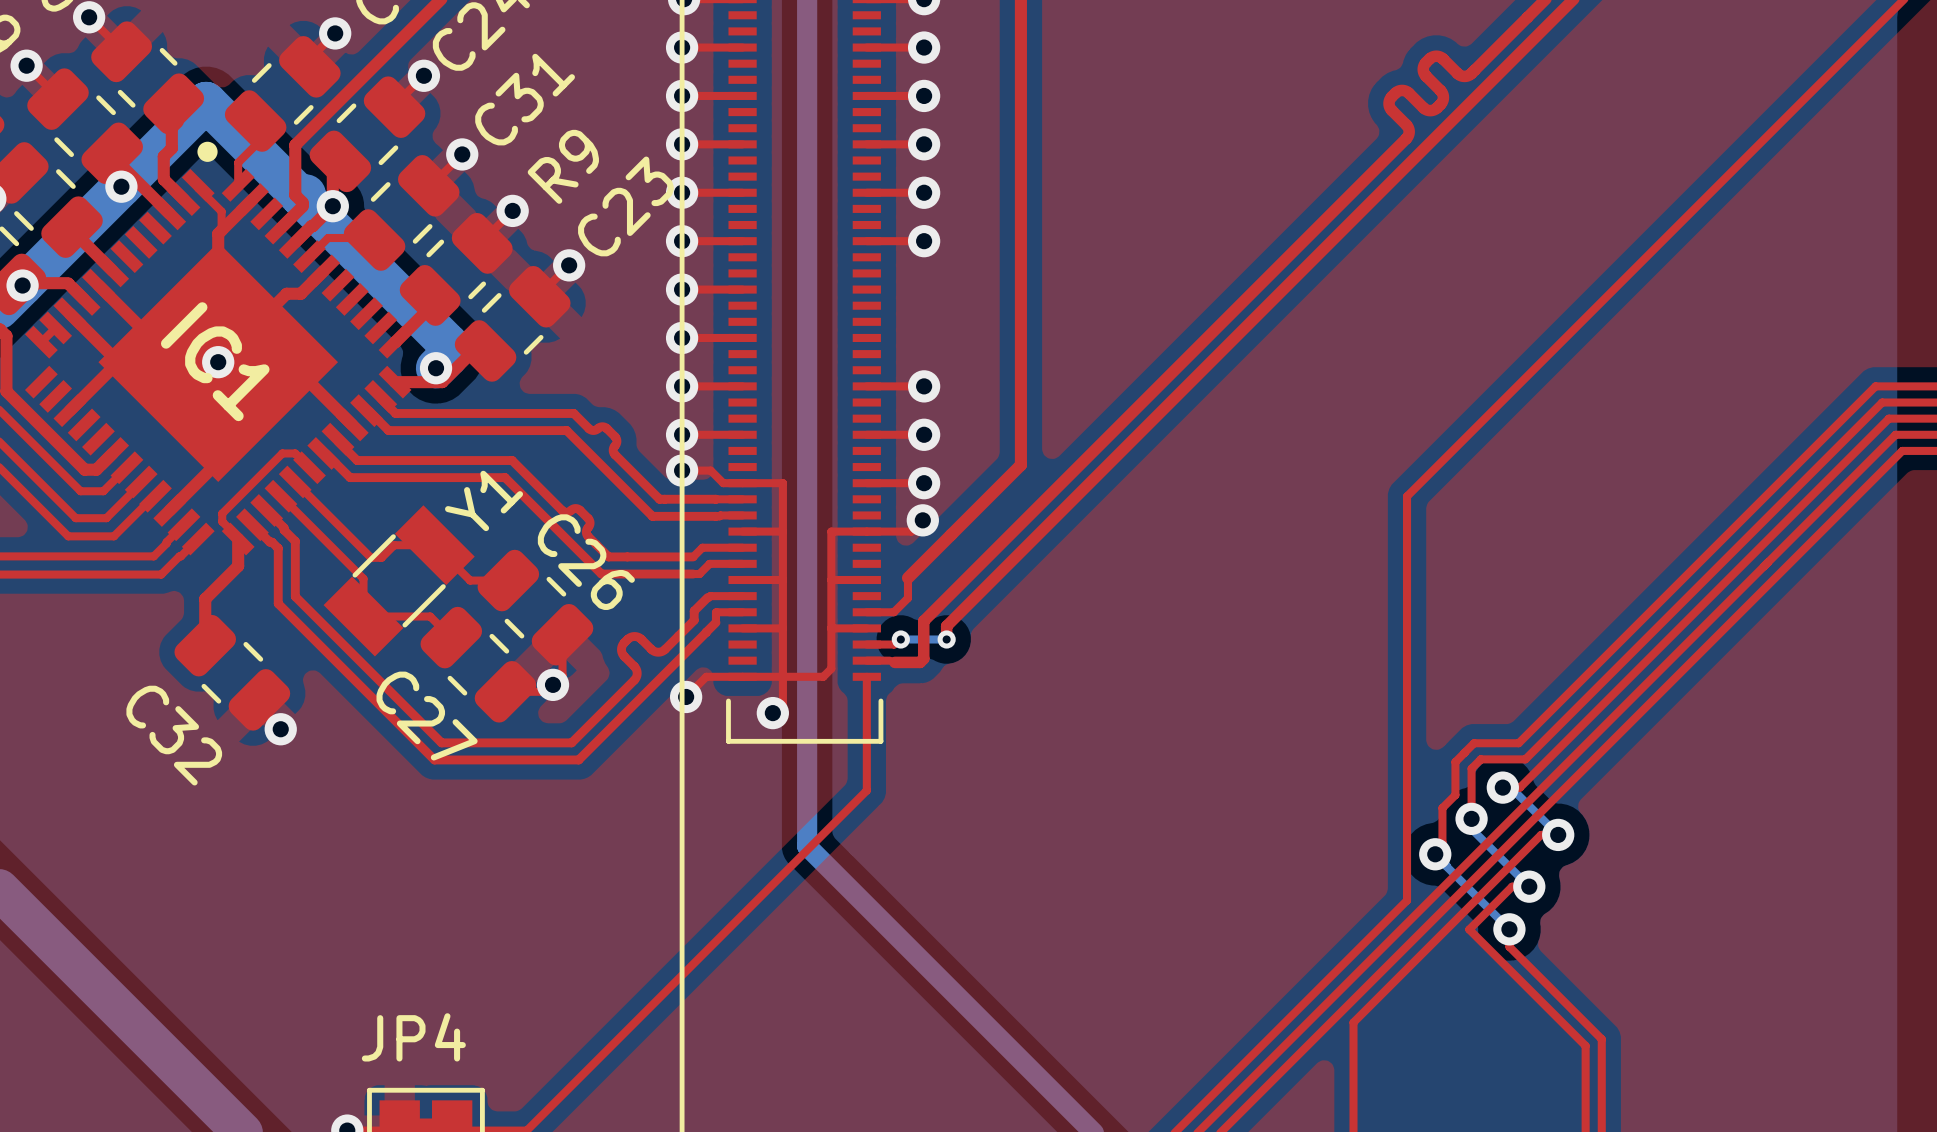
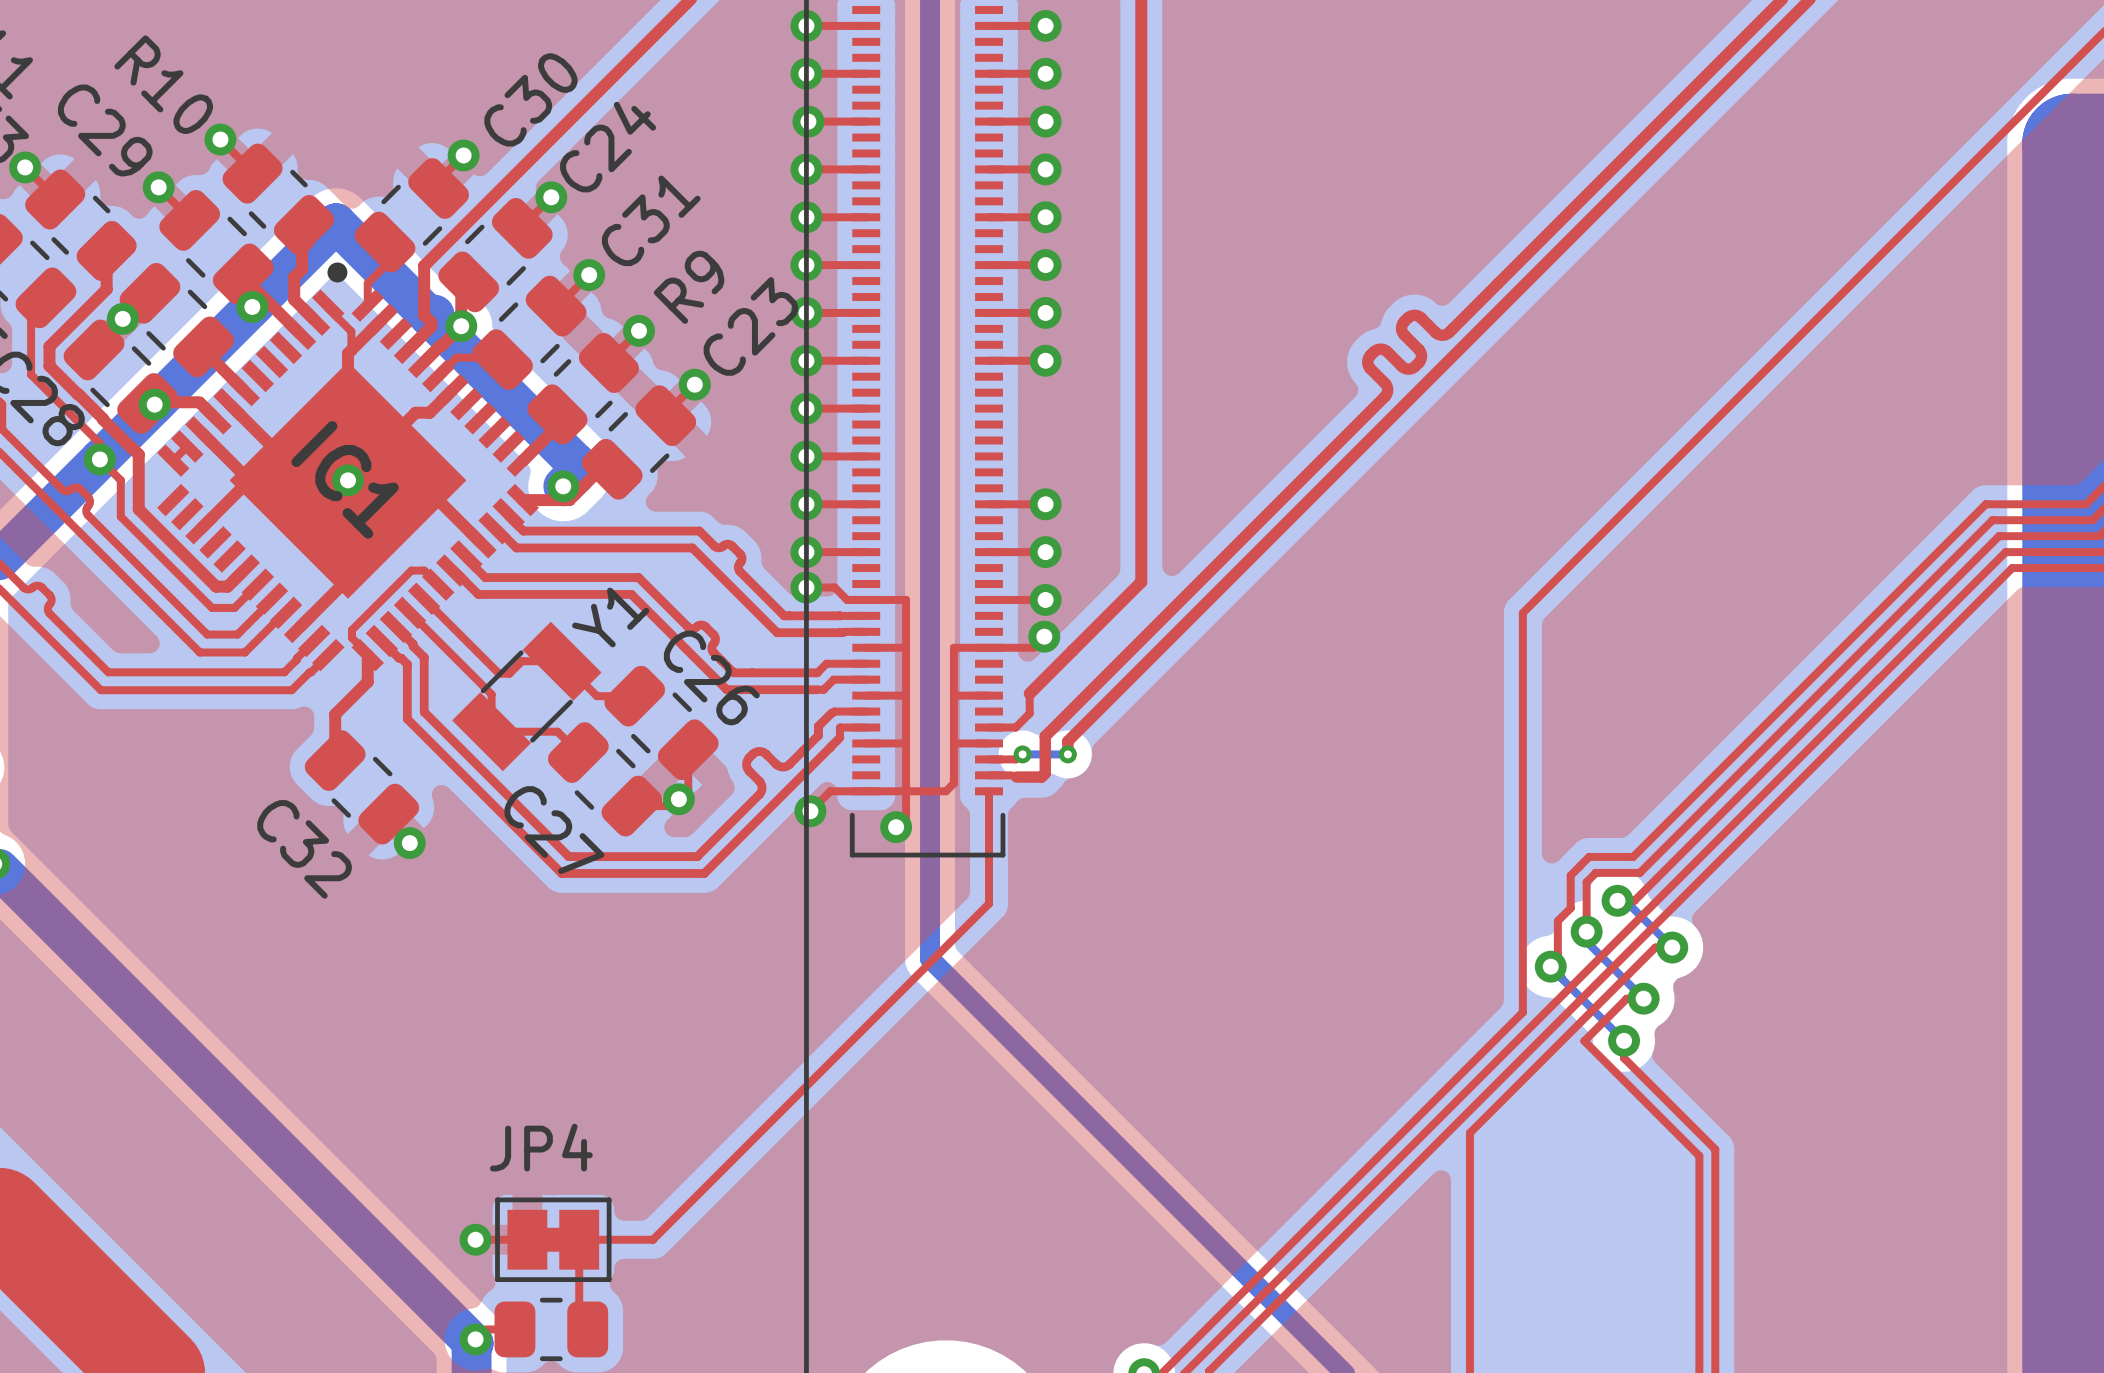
top track: (1471, 73) (1466, 76) (1460, 75) (1438, 56) (1432, 57) (1426, 62) (1423, 68) (1424, 74) (1442, 93) (1443, 100) (1440, 104) -> (1586, 195) (1556, 225)
top track: (1437, 107) (1432, 110) (1426, 109) (1404, 90) (1397, 91) (1391, 96) (1389, 102) (1390, 108) (1408, 128) (1409, 133) (1406, 138) -> (1552, 228) (1522, 259)
top track: (1332, 212) (1301, 243) -> (1449, 332) (1444, 335) (1438, 334) (1416, 315) (1410, 316) (1404, 321) (1401, 327) (1402, 333) (1420, 352) (1421, 358) (1418, 362)
top track: (1298, 246) (1267, 277) -> (1415, 366) (1409, 369) (1404, 368) (1382, 349) (1376, 350) (1370, 355) (1367, 360) (1369, 366) (1386, 386) (1387, 392) (1384, 396)

